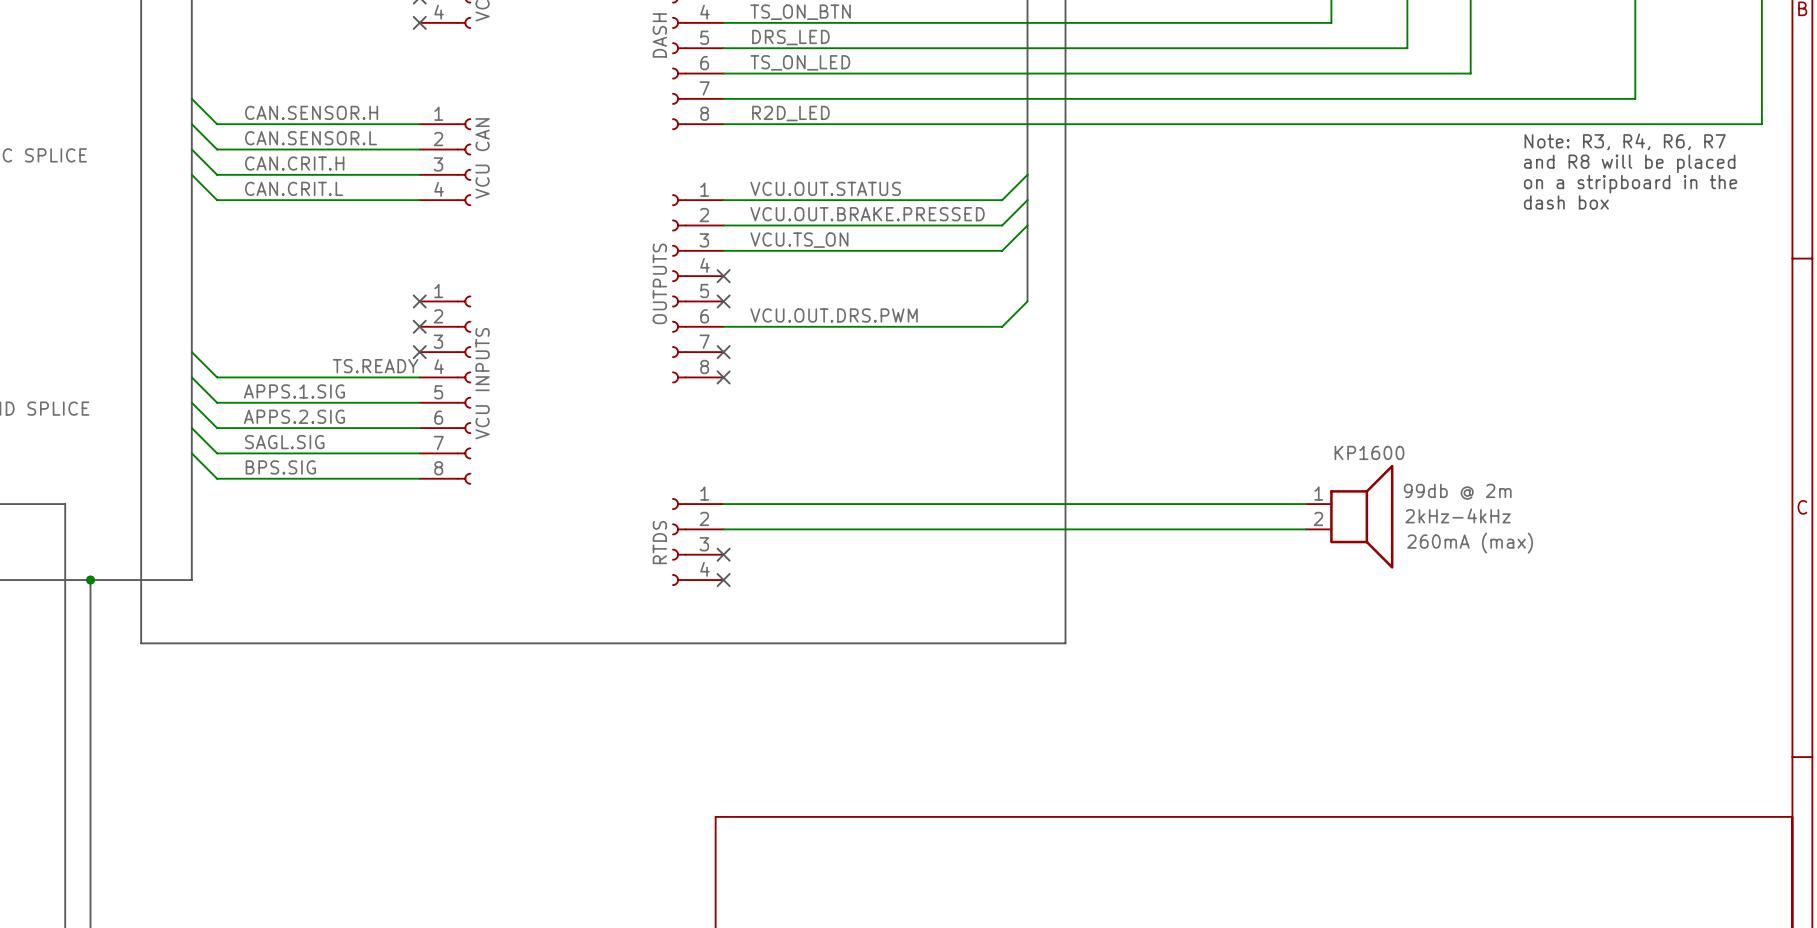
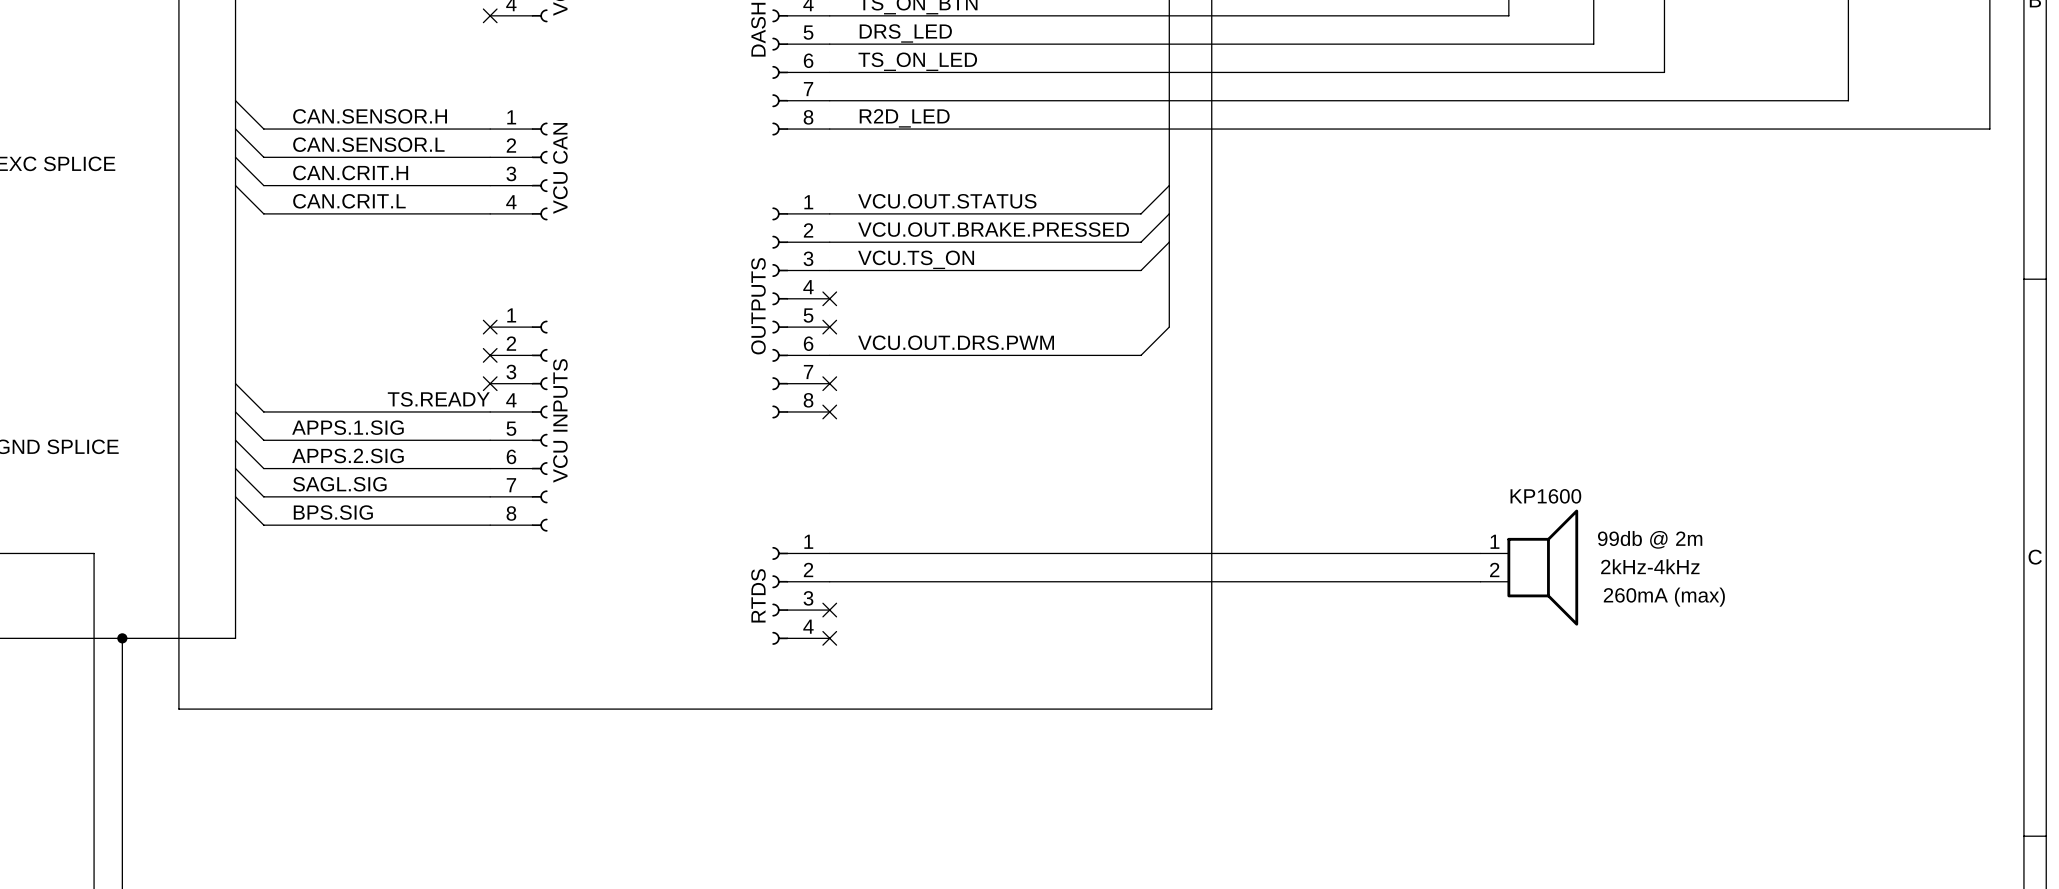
text: Note: R3, R4, R6, R7 (1625, 141) -> none
text: and R8 will be placed (1629, 163) -> none
text: on a stripboard in the (1630, 184) -> none
text: dash box (1566, 202) -> none

